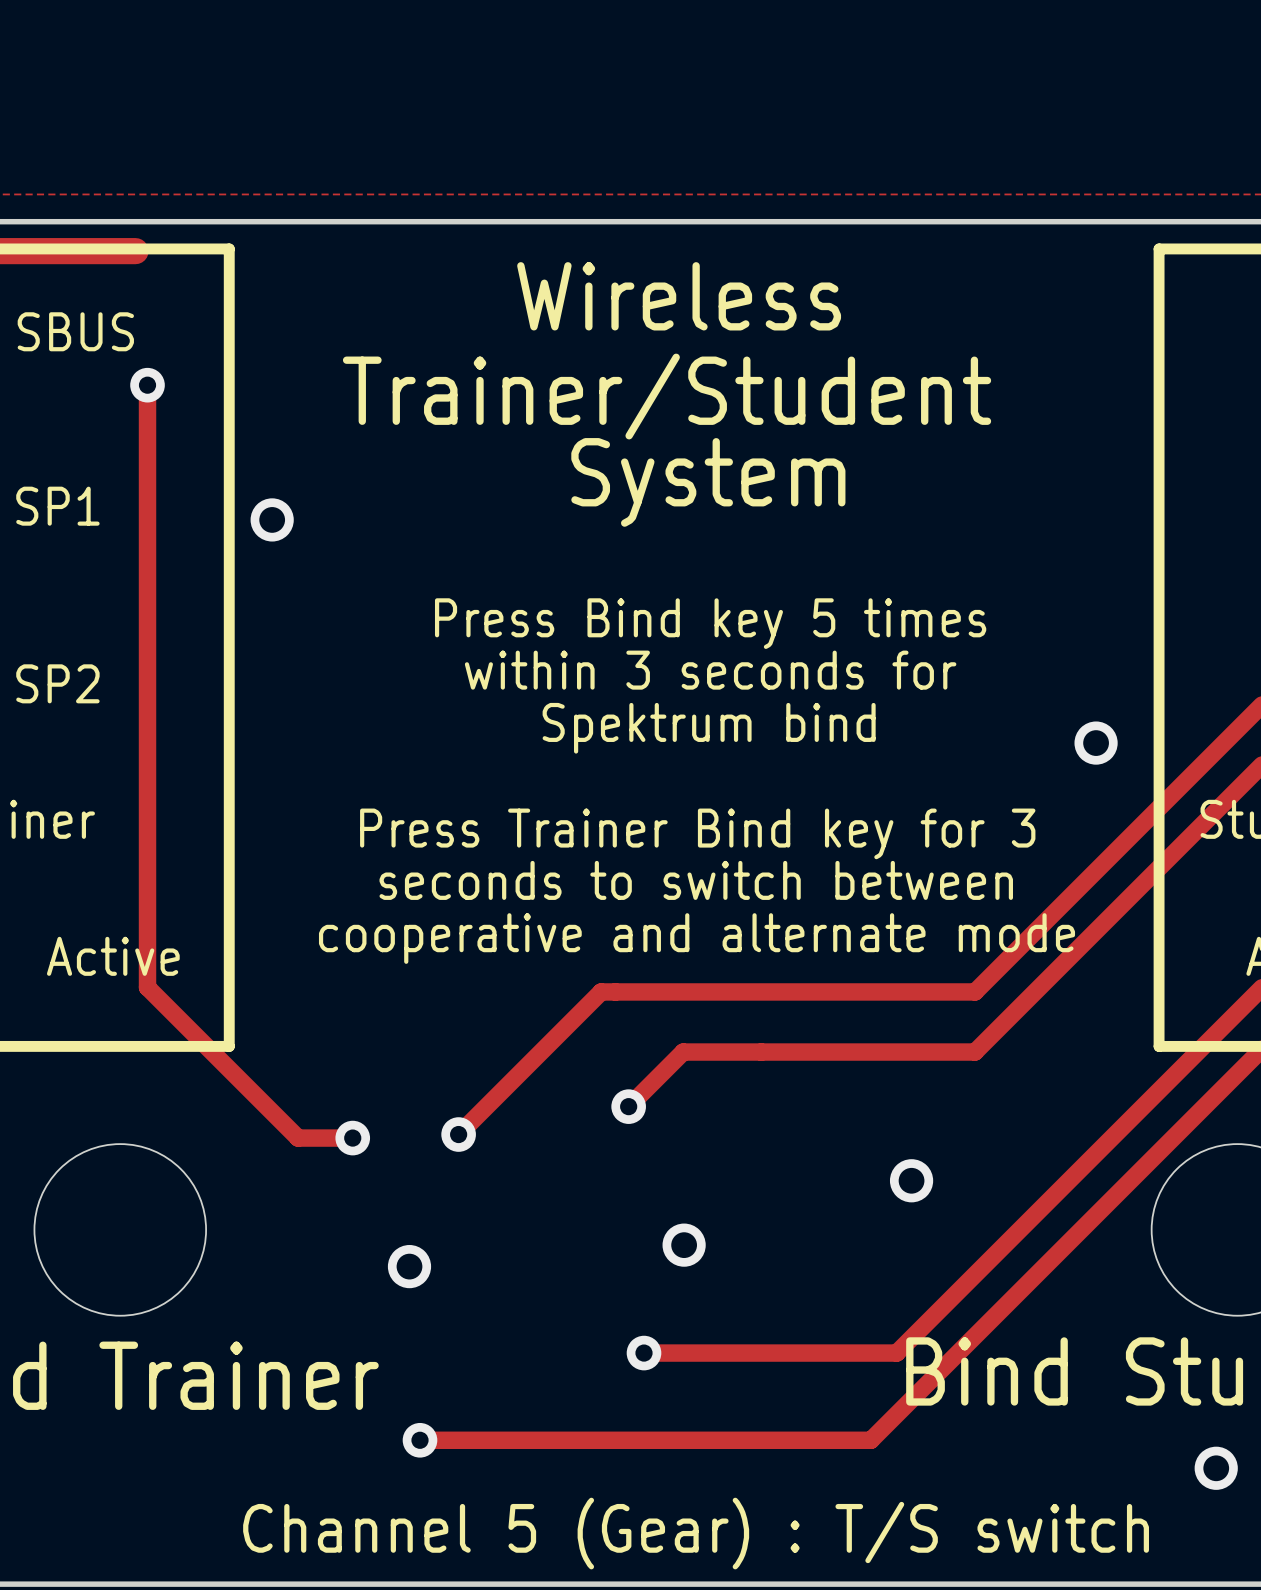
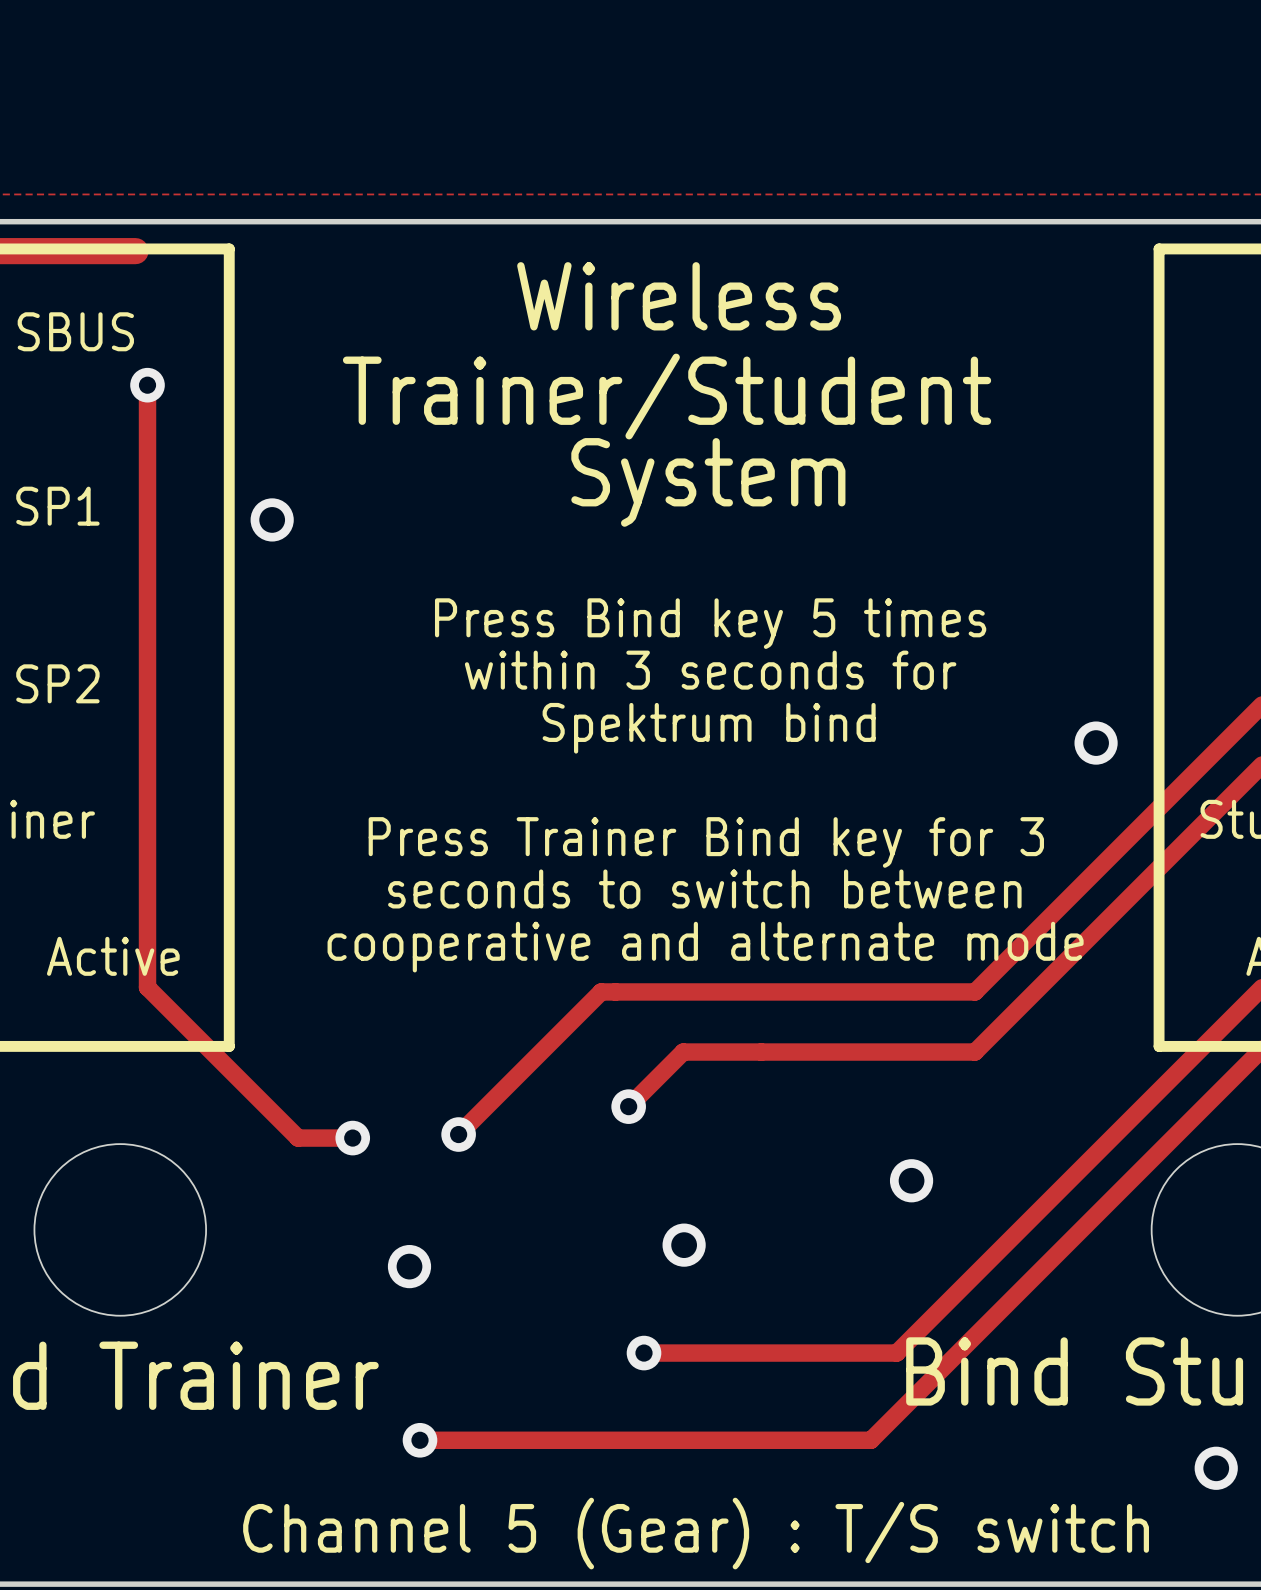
text position: Press Trainer Bind key for 3 (697, 833) -> Press Trainer Bind key for 3 (706, 842)
text position: seconds to switch between (696, 880) -> seconds to switch between (704, 888)
text position: cooperative and alternate mode (697, 938) -> cooperative and alternate mode (705, 947)

